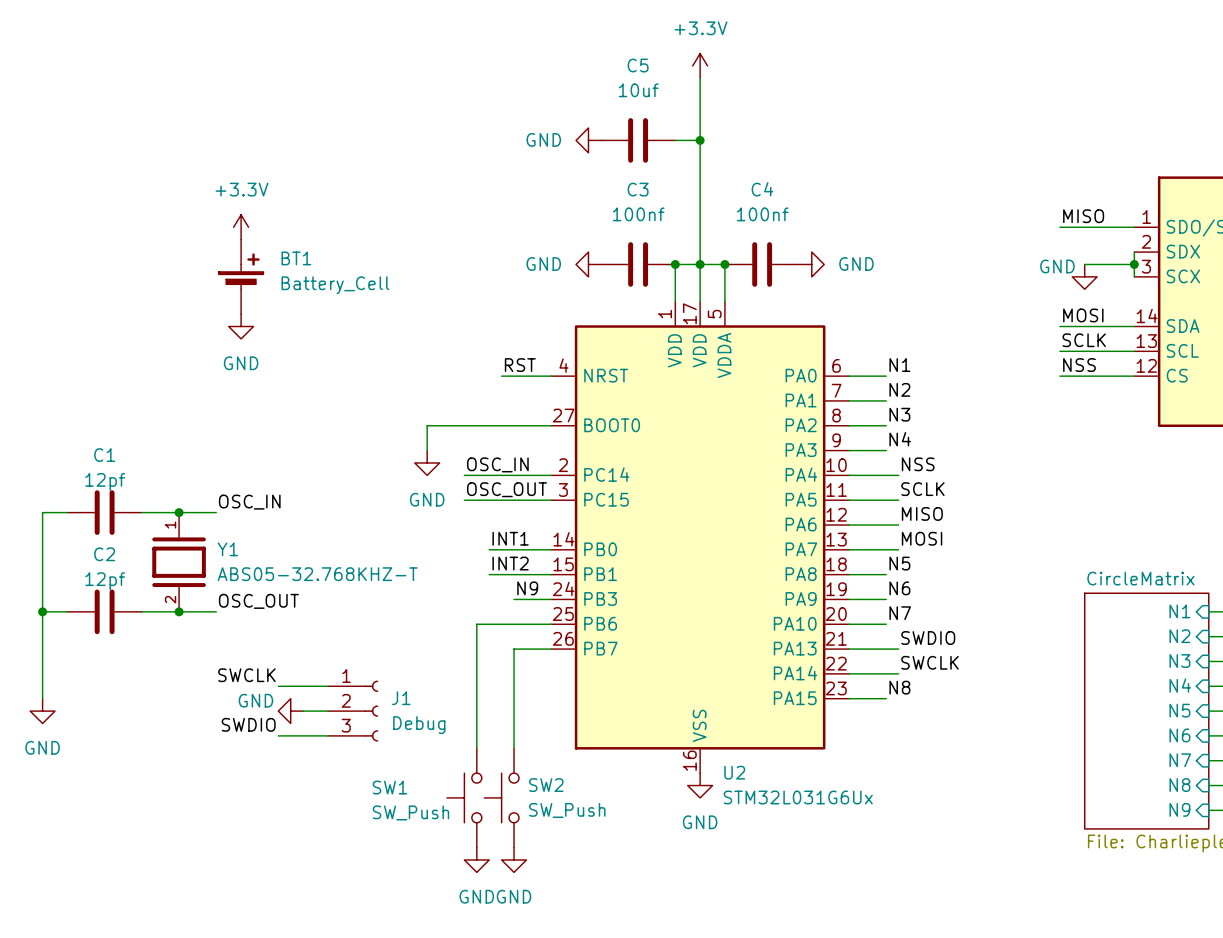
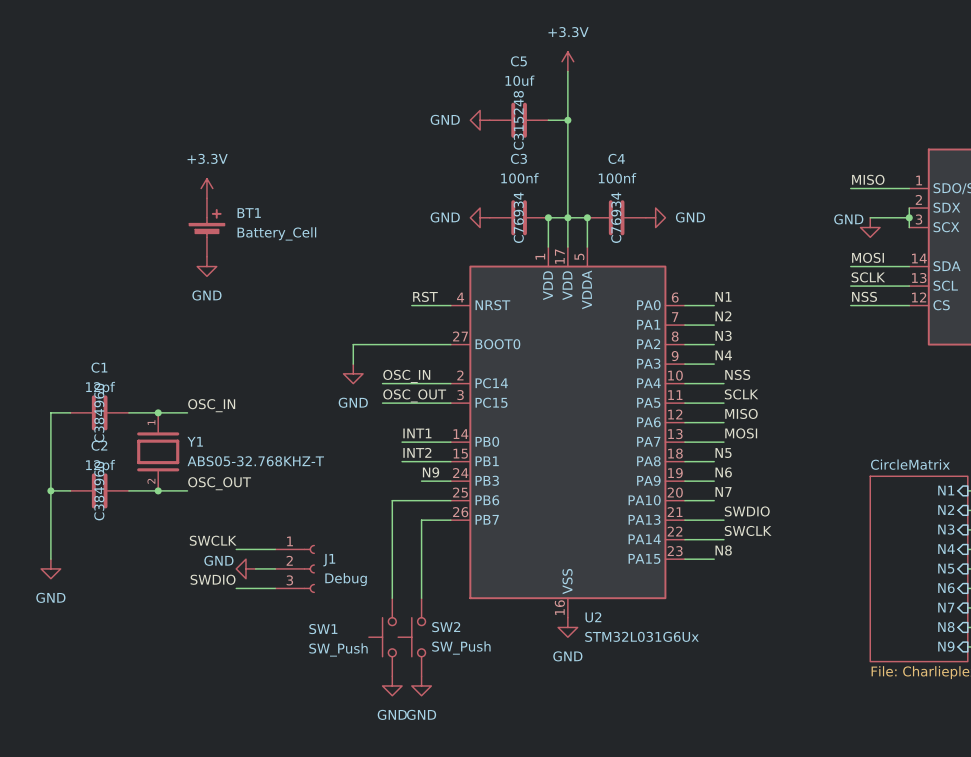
C5 text: none -> C315248 (518, 120)
C3 text: none -> C76934 (518, 217)
C4 text: none -> C76934 (616, 217)
C1 text: none -> C384960 (99, 412)
C2 text: none -> C384960 (99, 490)

